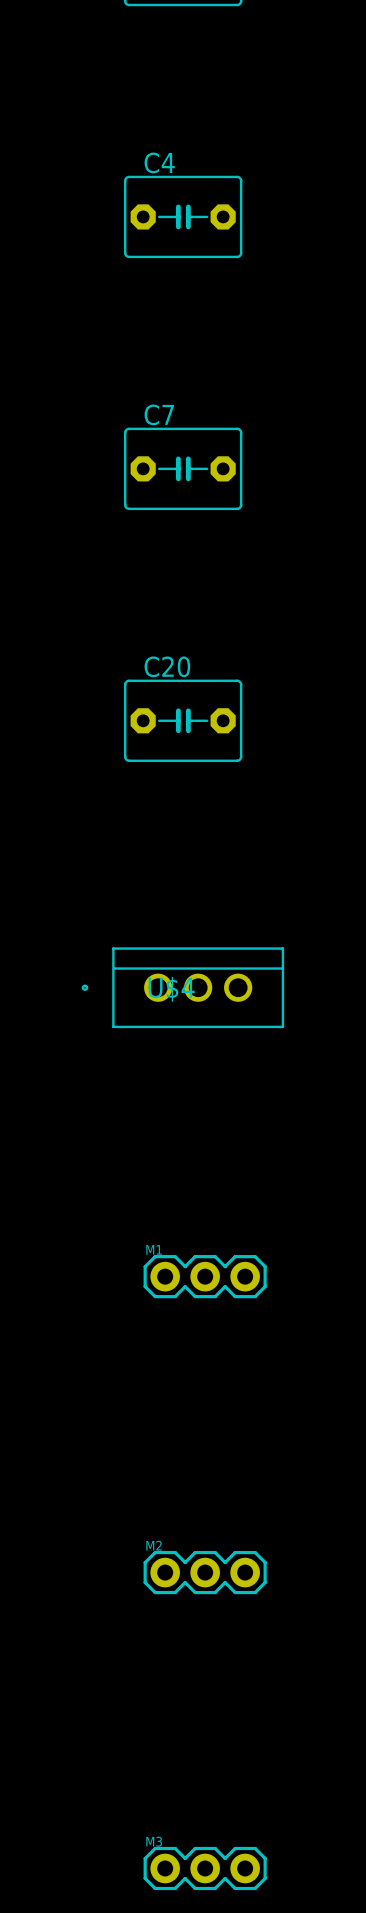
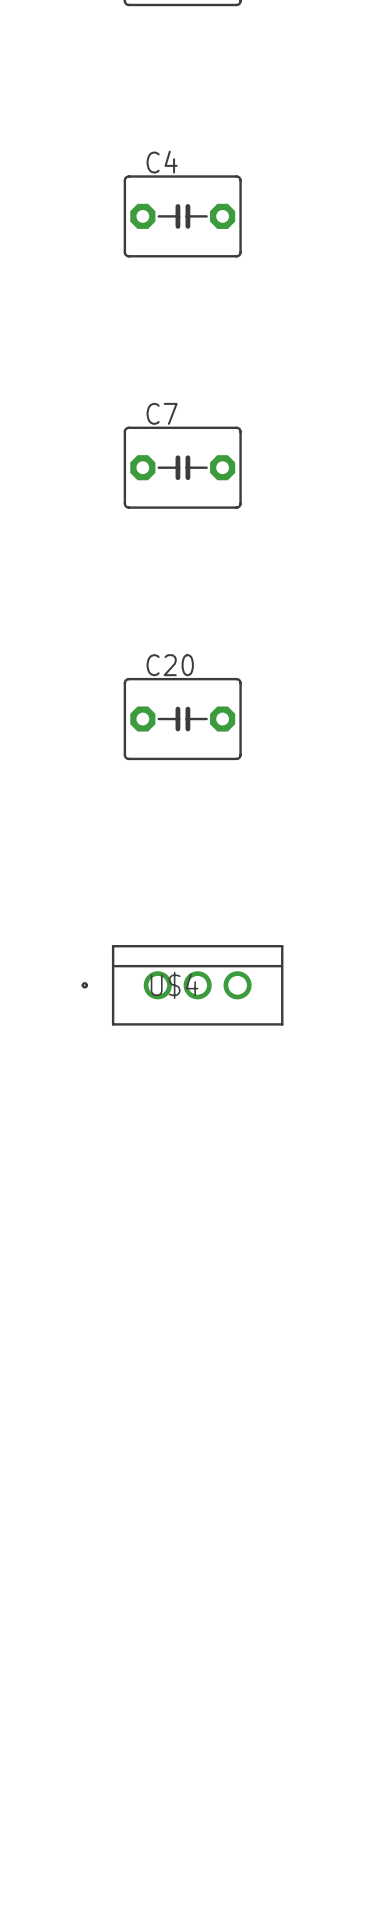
M1: (205, 1276) -> none
M2: (205, 1572) -> none
M3: (205, 1868) -> none

